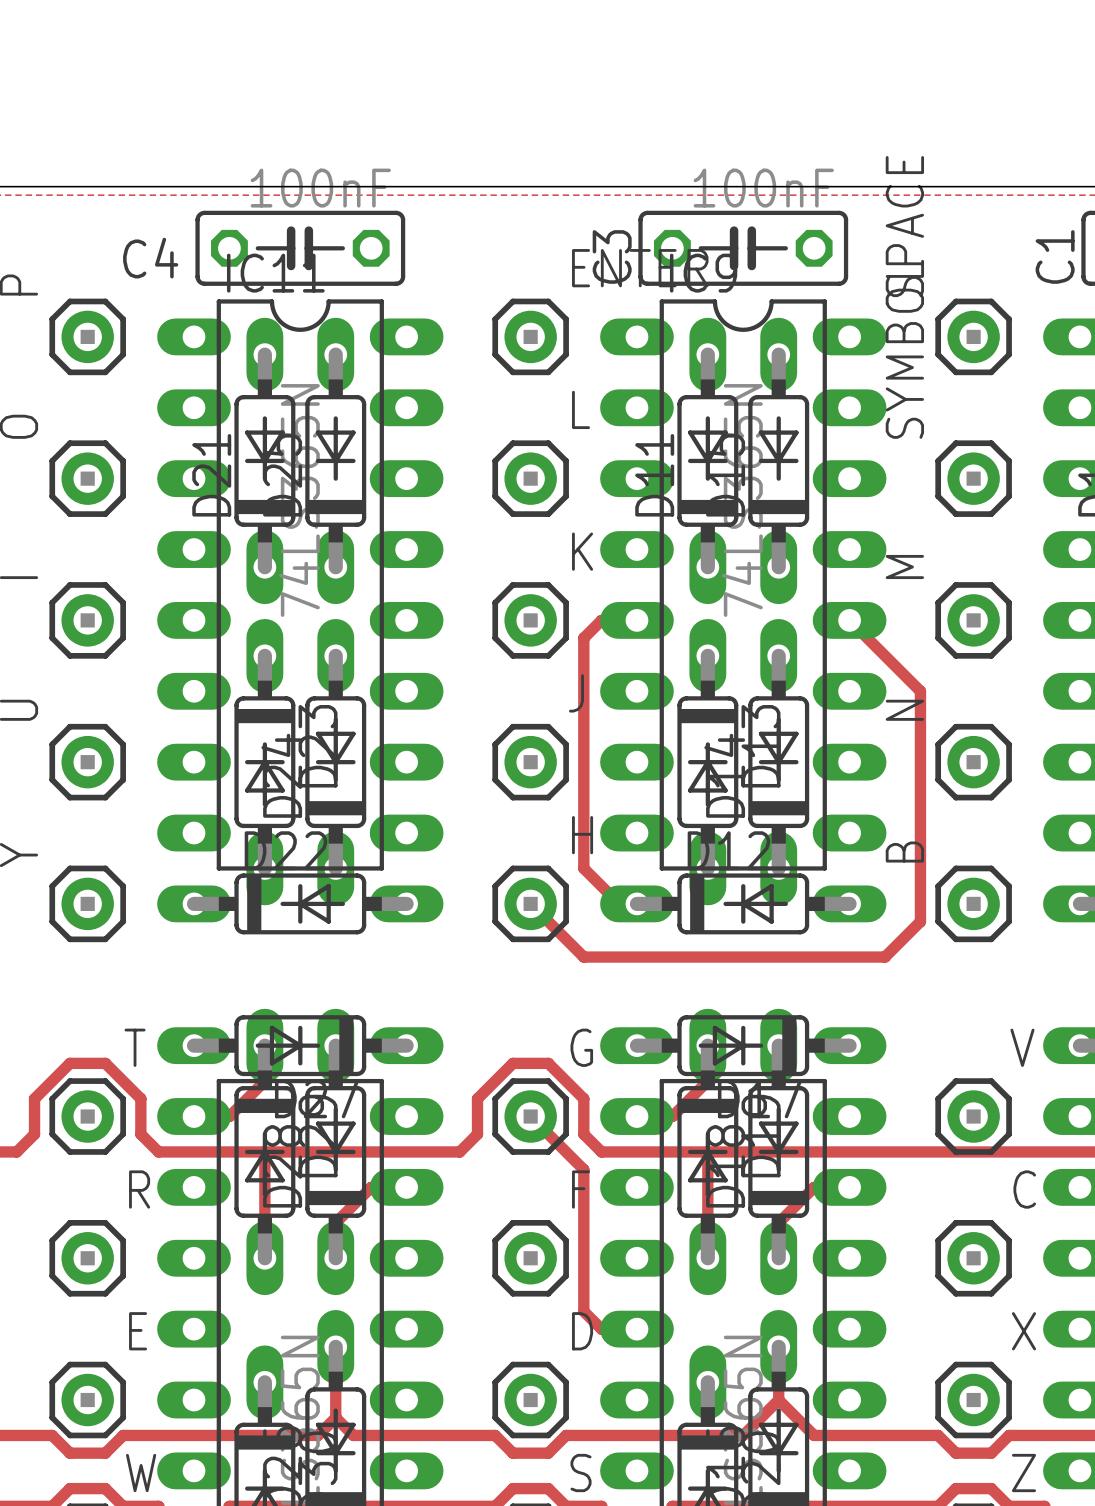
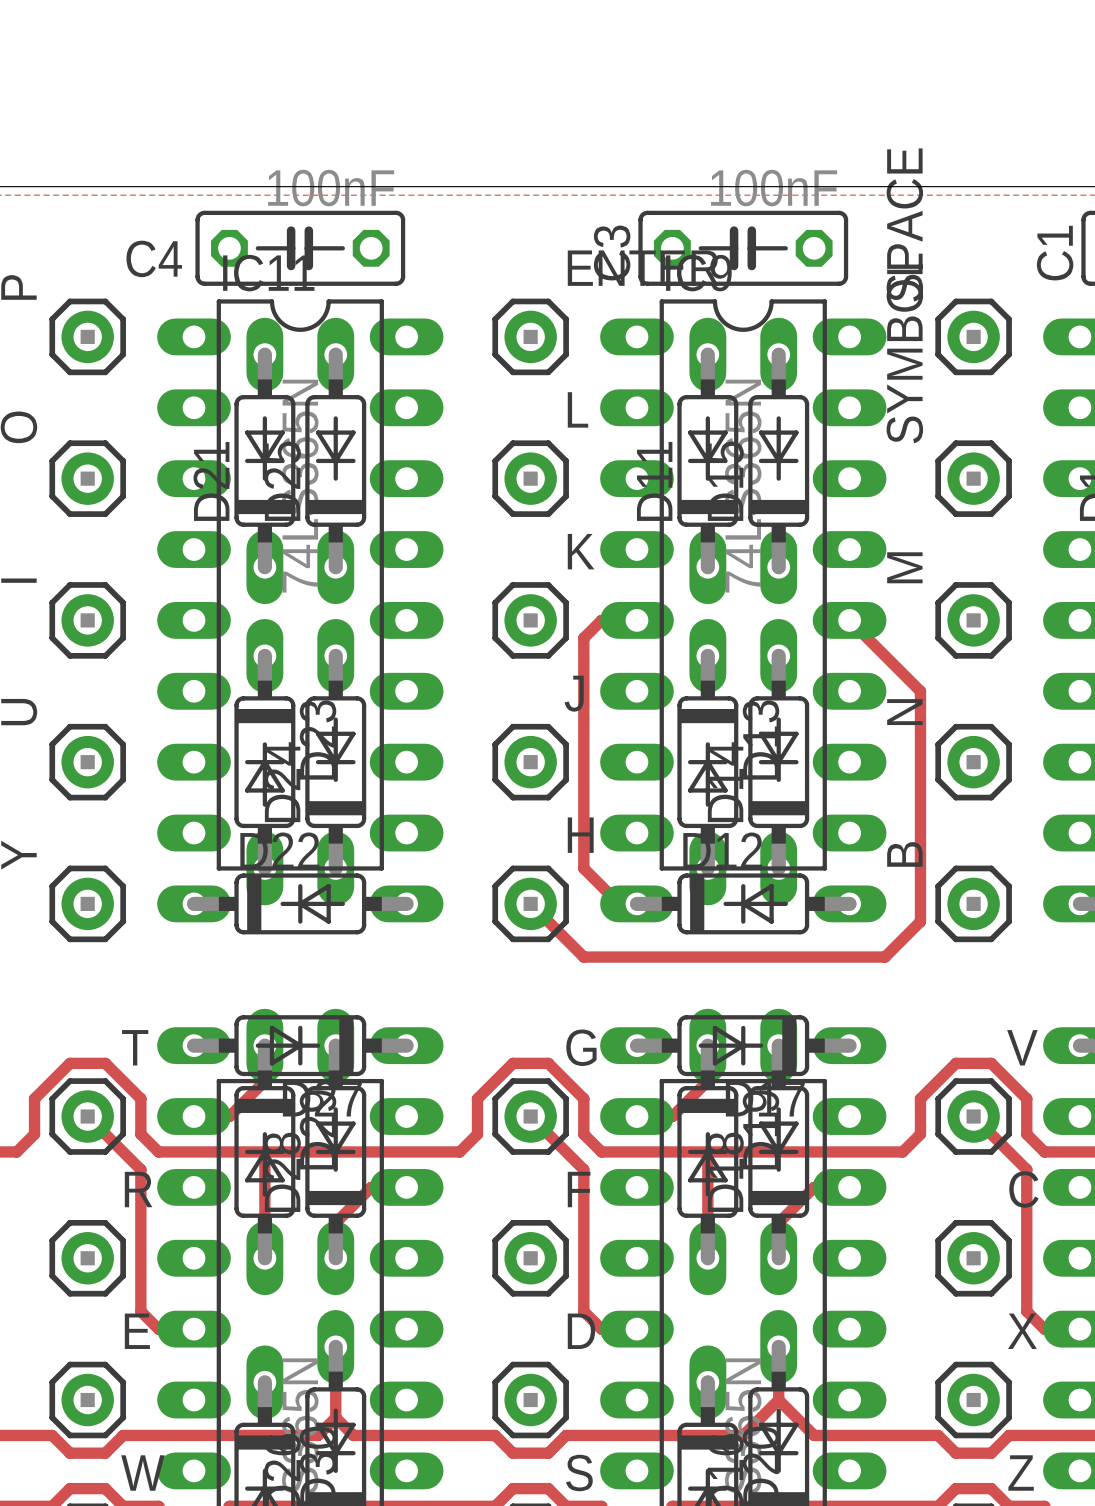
track: none -> (87, 1116) (140, 1169) (140, 1311) (158, 1329) (194, 1329)
track: none -> (973, 1116) (1026, 1169) (1026, 1311) (1044, 1329) (1079, 1329)
track: (902, 1151) (1044, 1151) -> (902, 1151) (920, 1134) (920, 1098) (955, 1063) (991, 1063) (1026, 1098) (1026, 1134) (1044, 1151)

